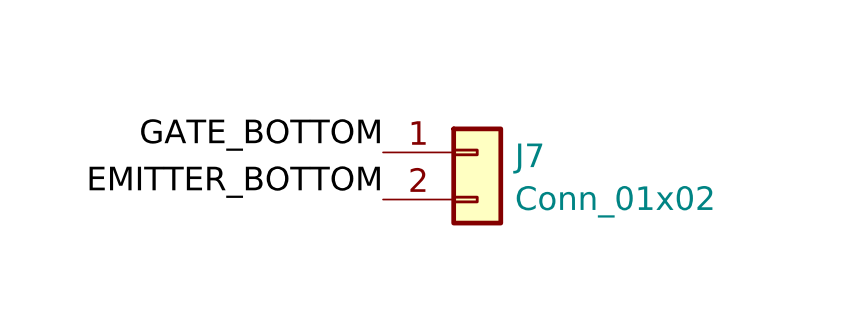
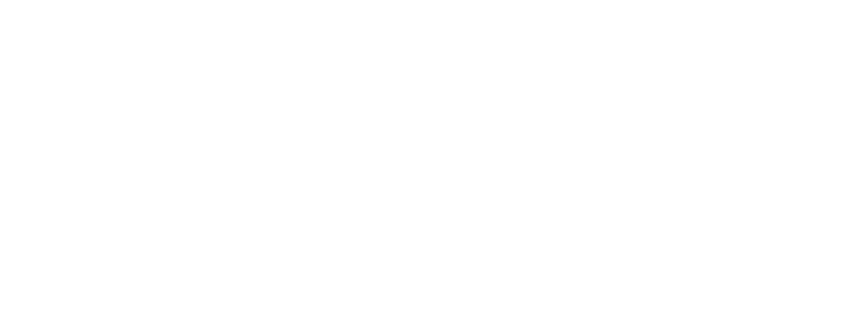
label: GATE_BOTTOM (260, 135) -> none
J7: Conn_01x02 (443, 175) -> none
label: EMITTER_BOTTOM (234, 182) -> none

